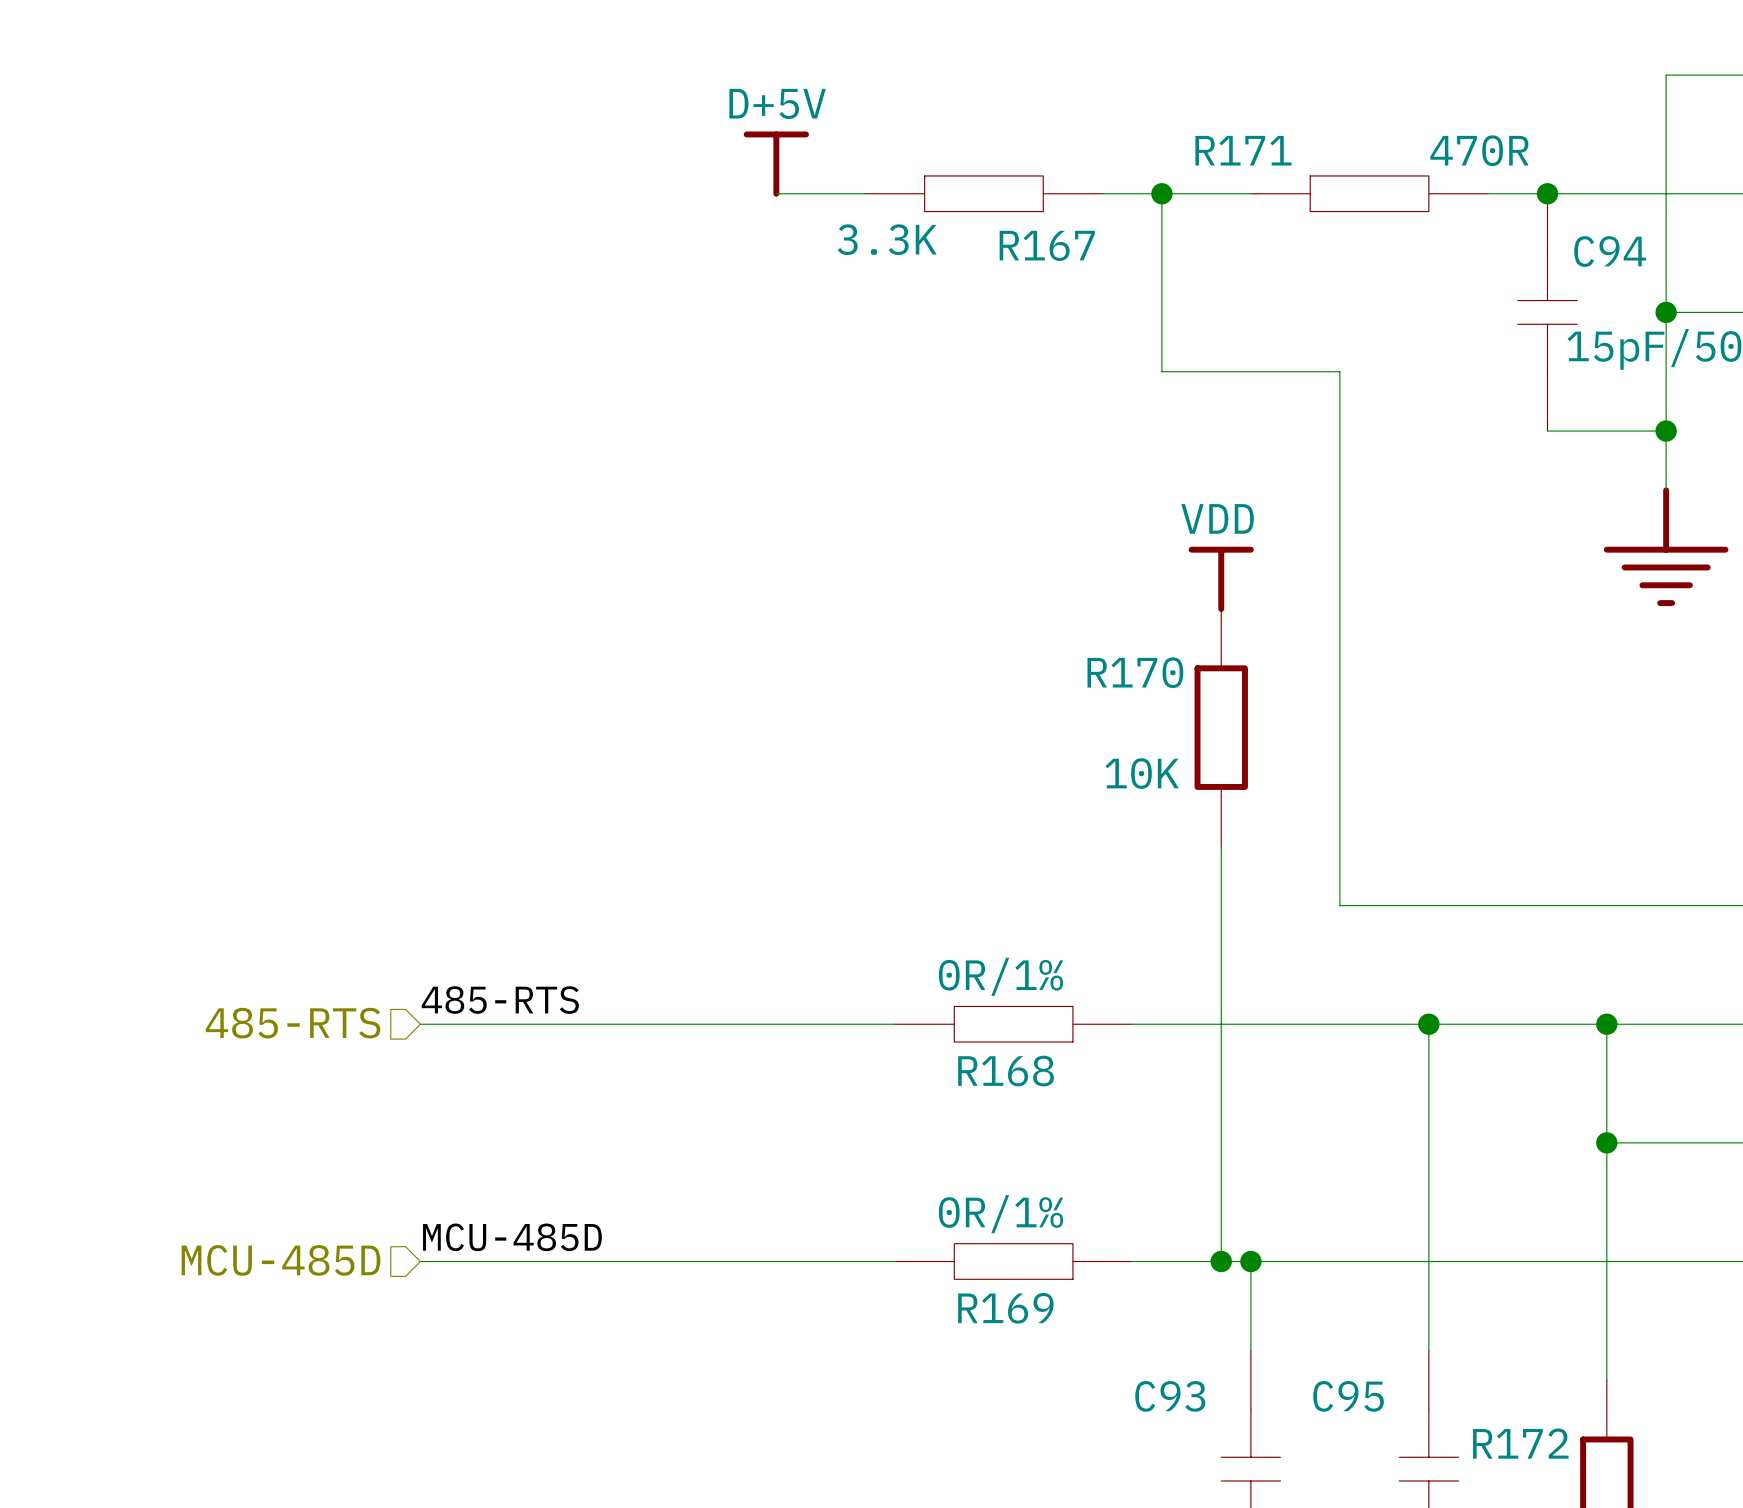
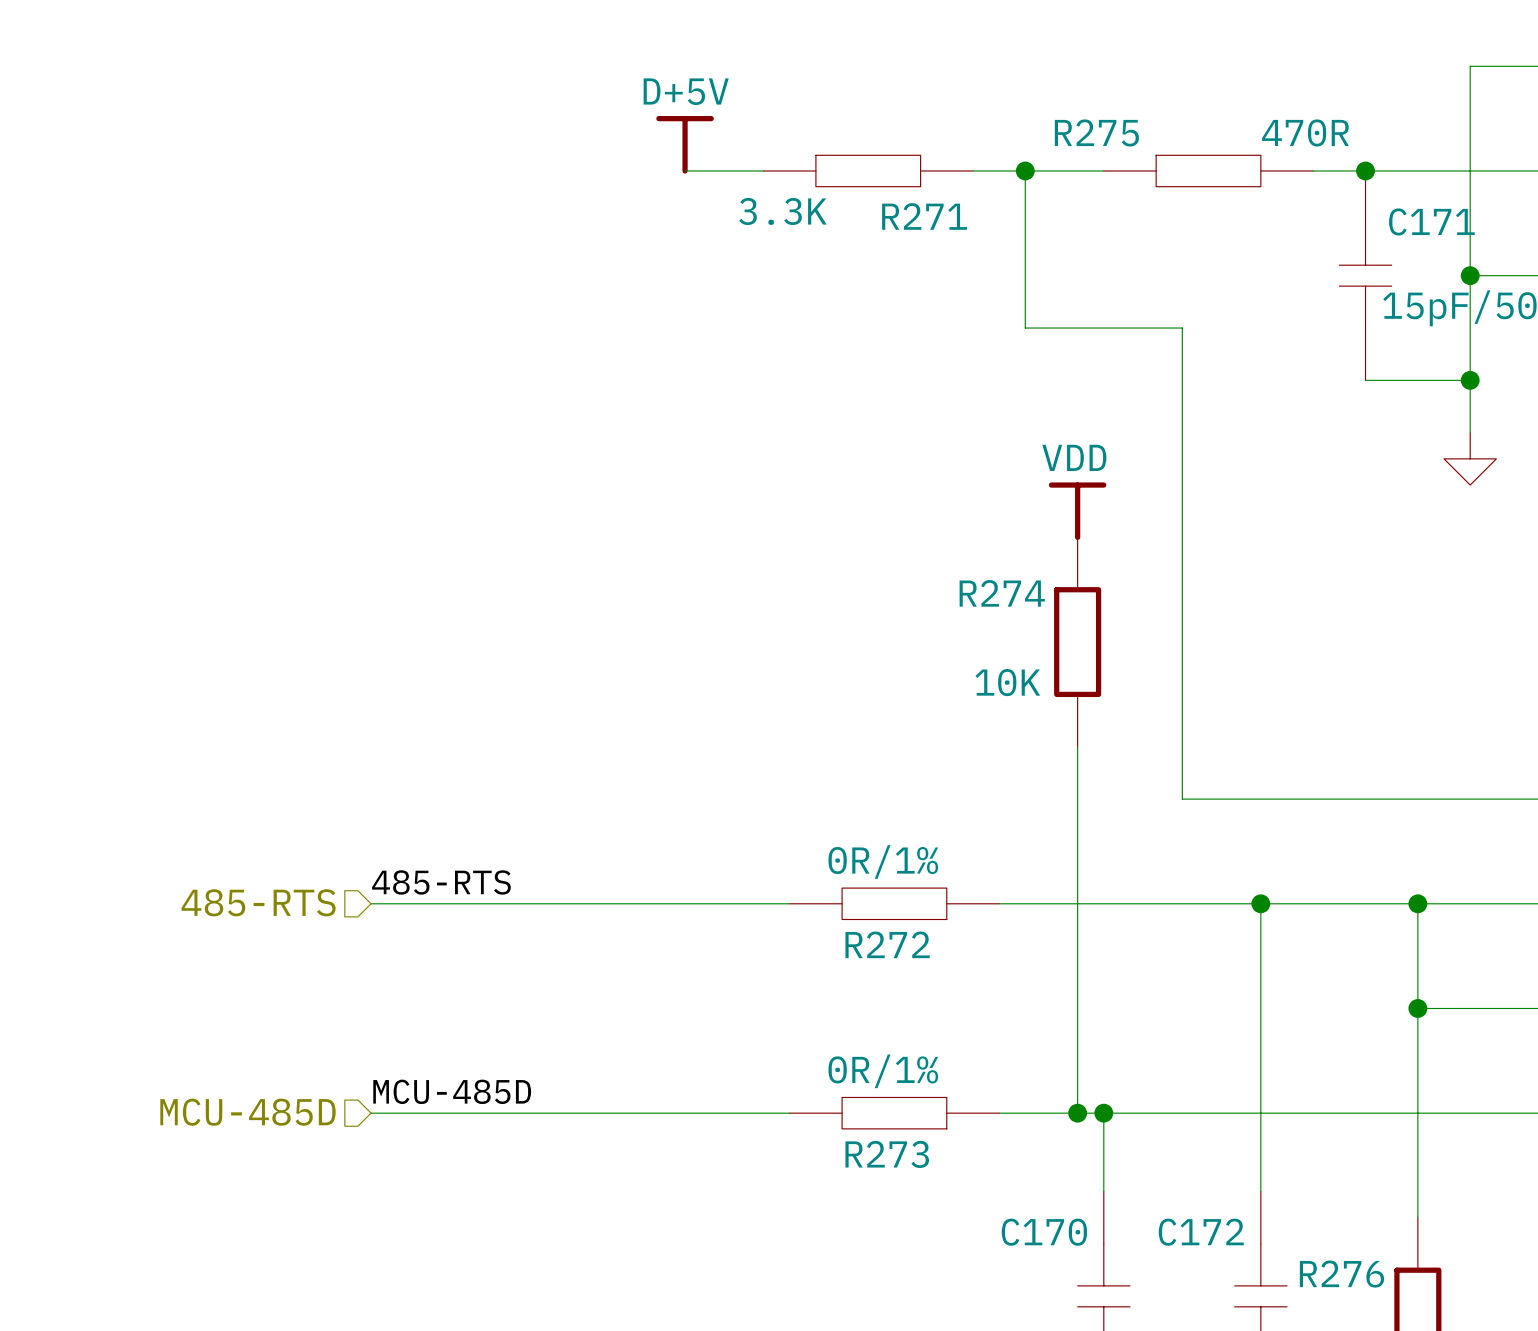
R171 name: R171 (1243, 150) -> R275 (1096, 132)
R167 name: R167 (1047, 245) -> R271 (924, 216)
C94 name: C94 (1610, 251) -> C171 (1431, 221)
power symbol: none -> (1470, 458)
power symbol: (1666, 546) -> none
R170 name: R170 (1135, 672) -> R274 (1002, 593)
R168 name: R168 (1006, 1071) -> R272 (887, 944)
R169 name: R169 (1005, 1308) -> R273 (887, 1154)
C93 name: C93 (1170, 1396) -> C170 (1044, 1232)
C95 name: C95 (1348, 1396) -> C172 (1201, 1232)
R172 name: R172 (1520, 1443) -> R276 (1341, 1274)

